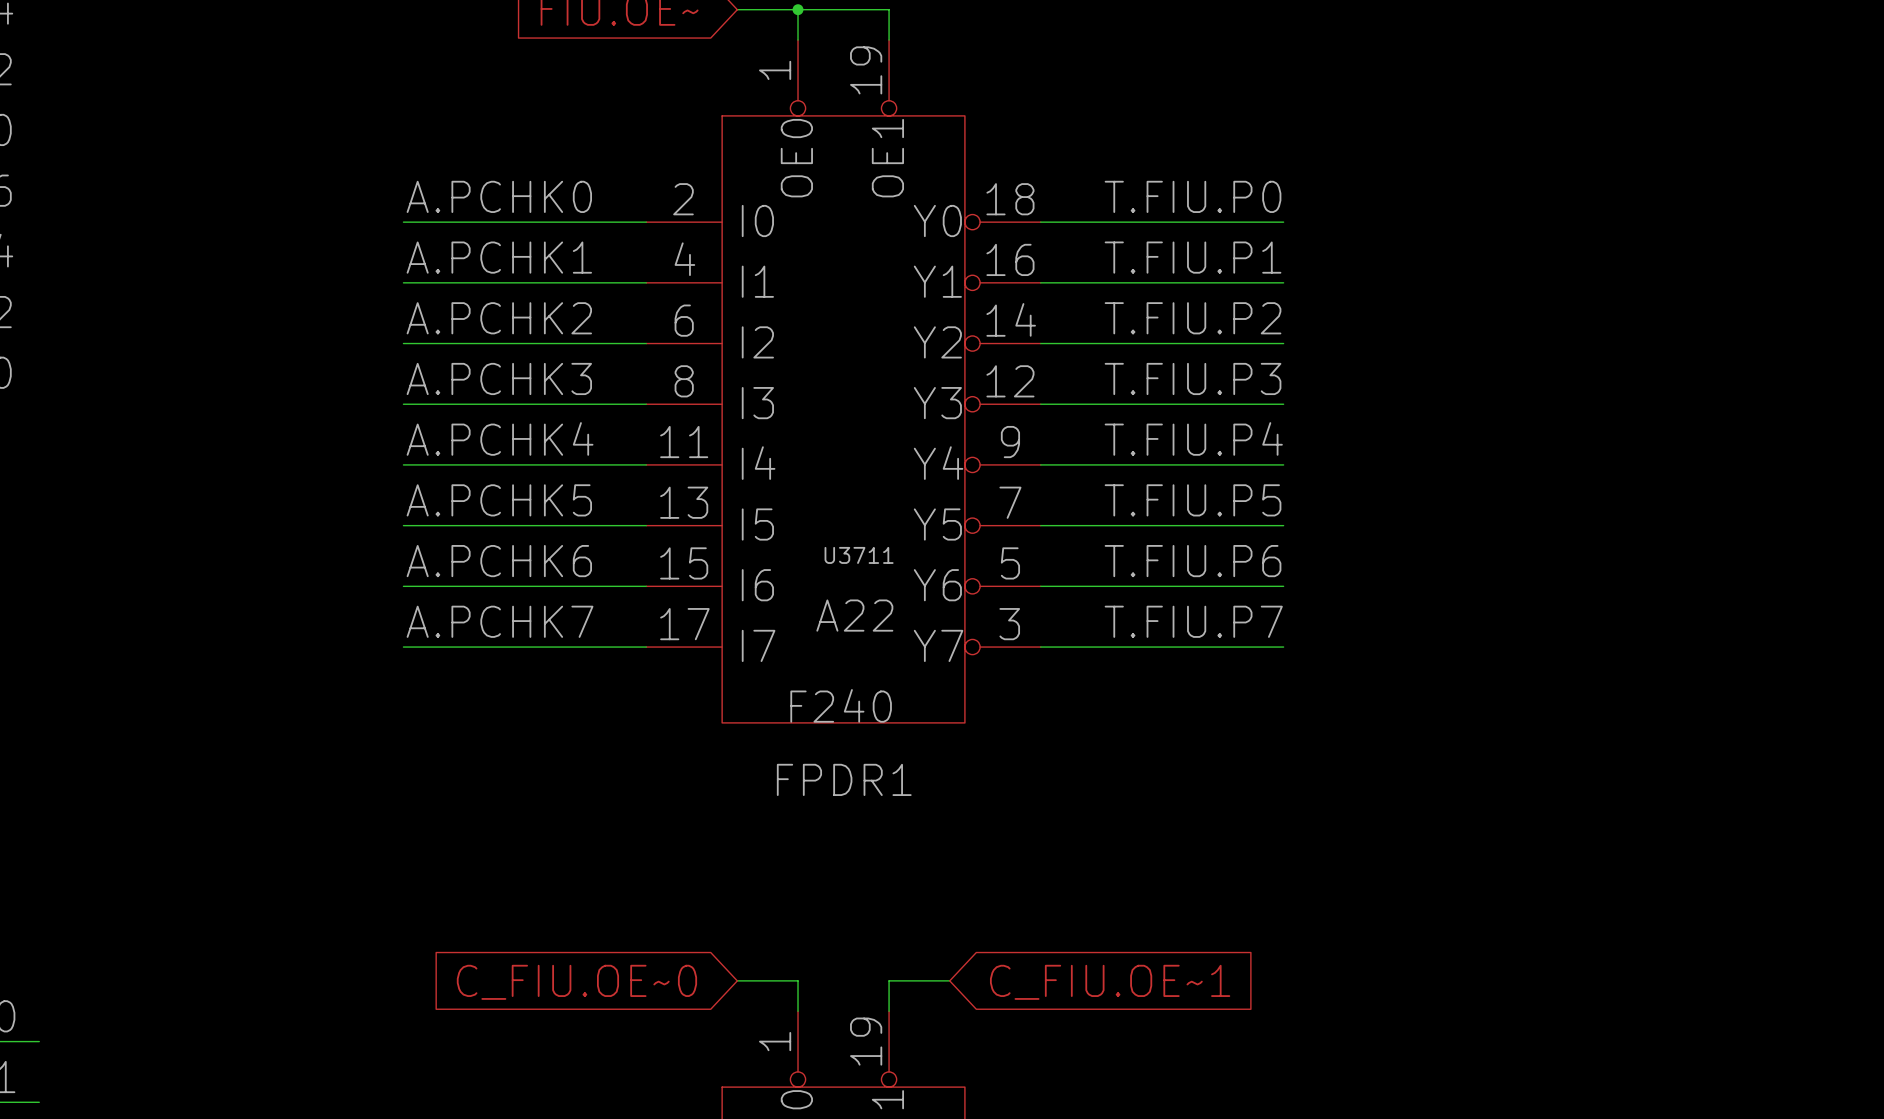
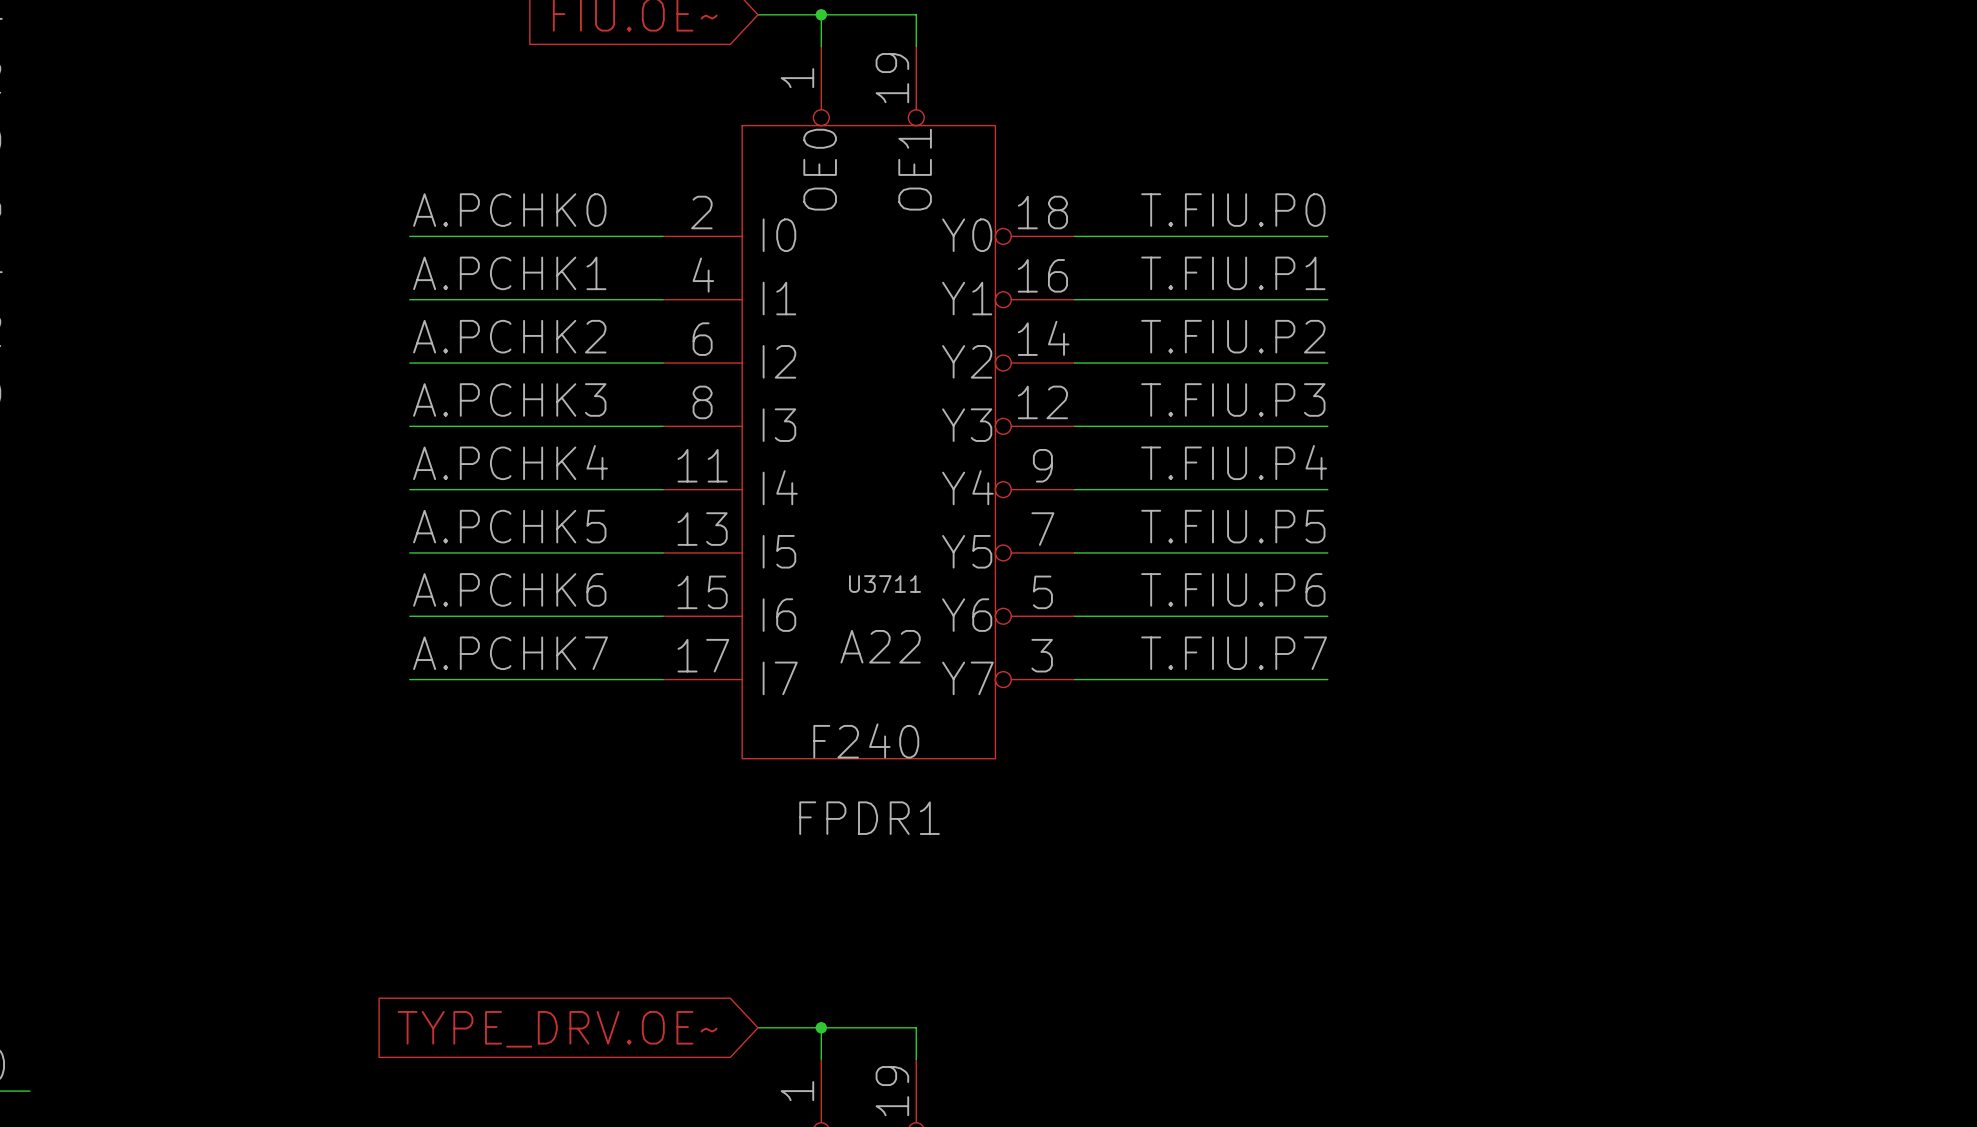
junction: none -> (821, 1027)
wire: (889, 980) (949, 980) -> (916, 1027) (821, 1027)
global label: C_FIU.OE~0 (576, 982) -> TYPE_DRV.OE~ (557, 1029)
global label: C_FIU.OE~1 (1110, 982) -> none

